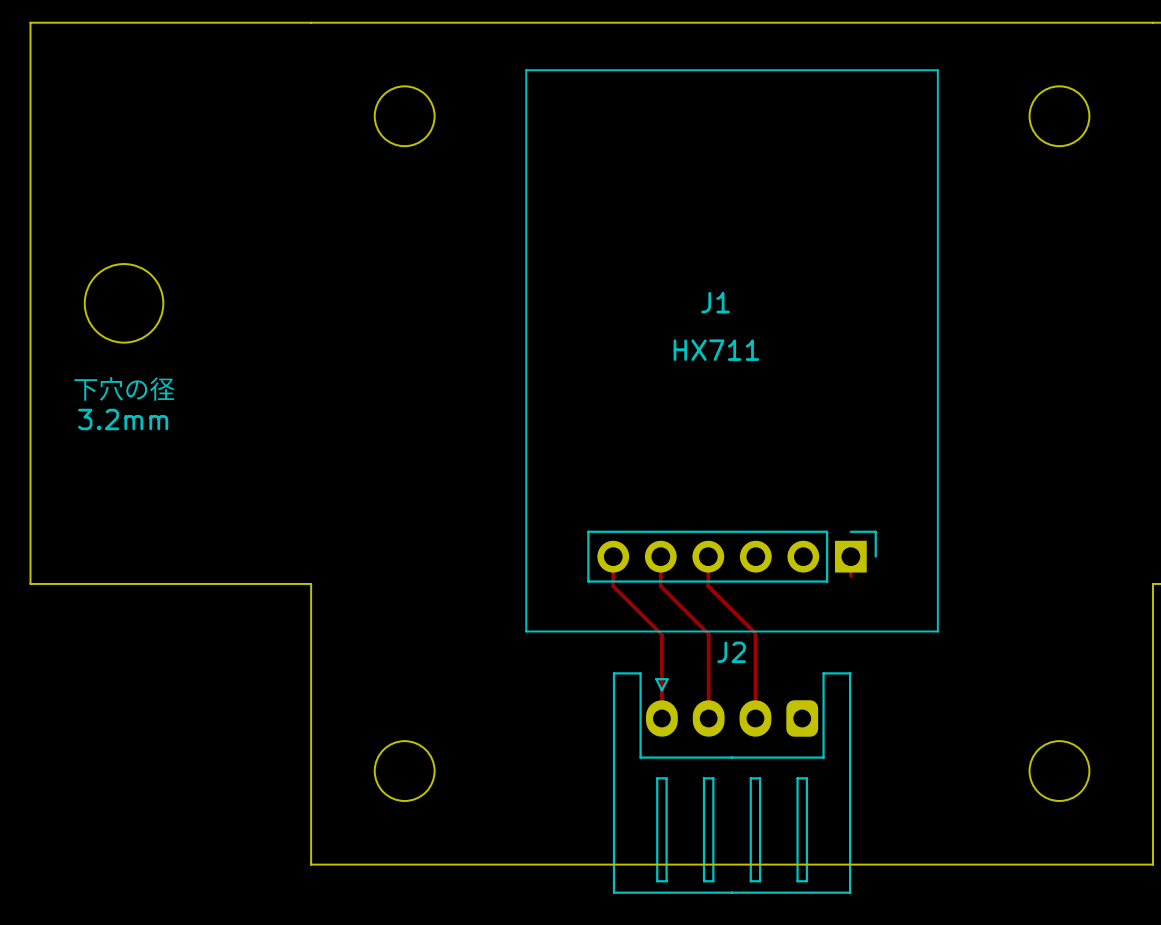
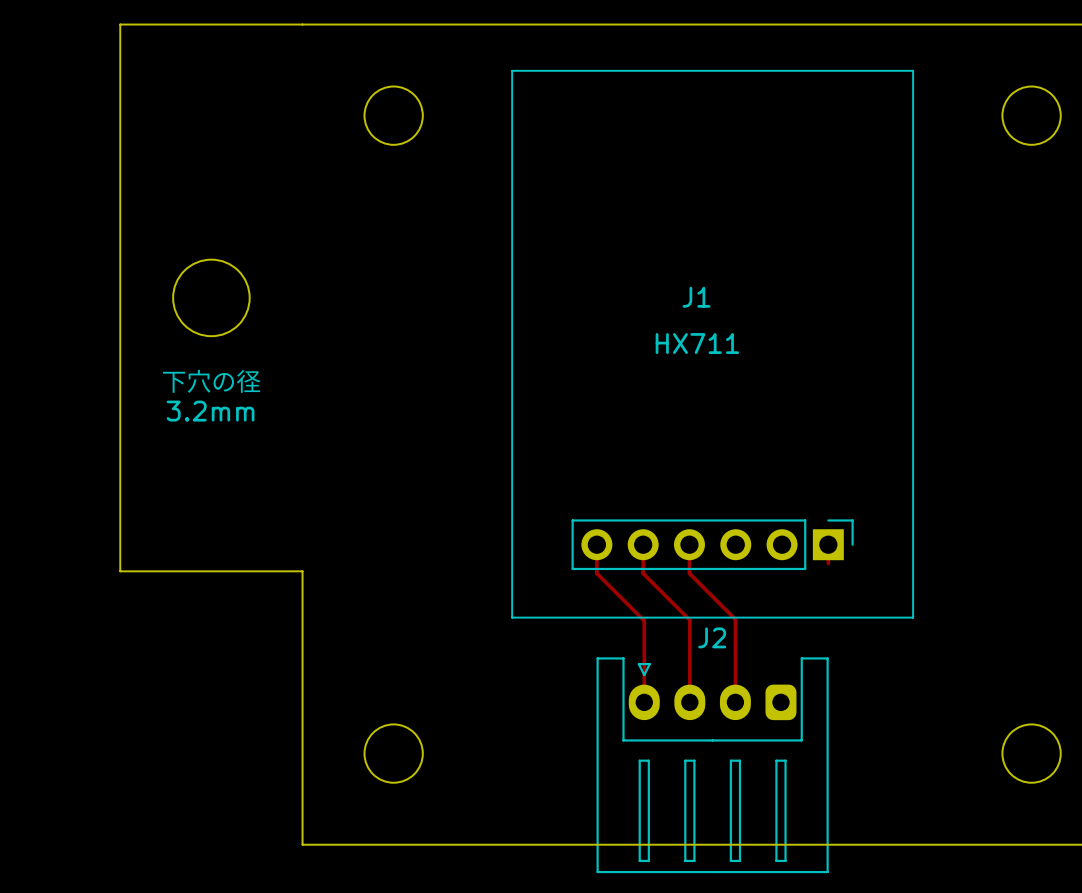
board edge: (124, 22) (30, 22) (30, 583) (124, 583) -> (120, 24) (120, 571)
round board edge position: (124, 303) -> (211, 297)
text position: 下穴の径 (124, 389) -> 下穴の径 (211, 381)
text position: 3.2mm (123, 419) -> 3.2mm (210, 411)

